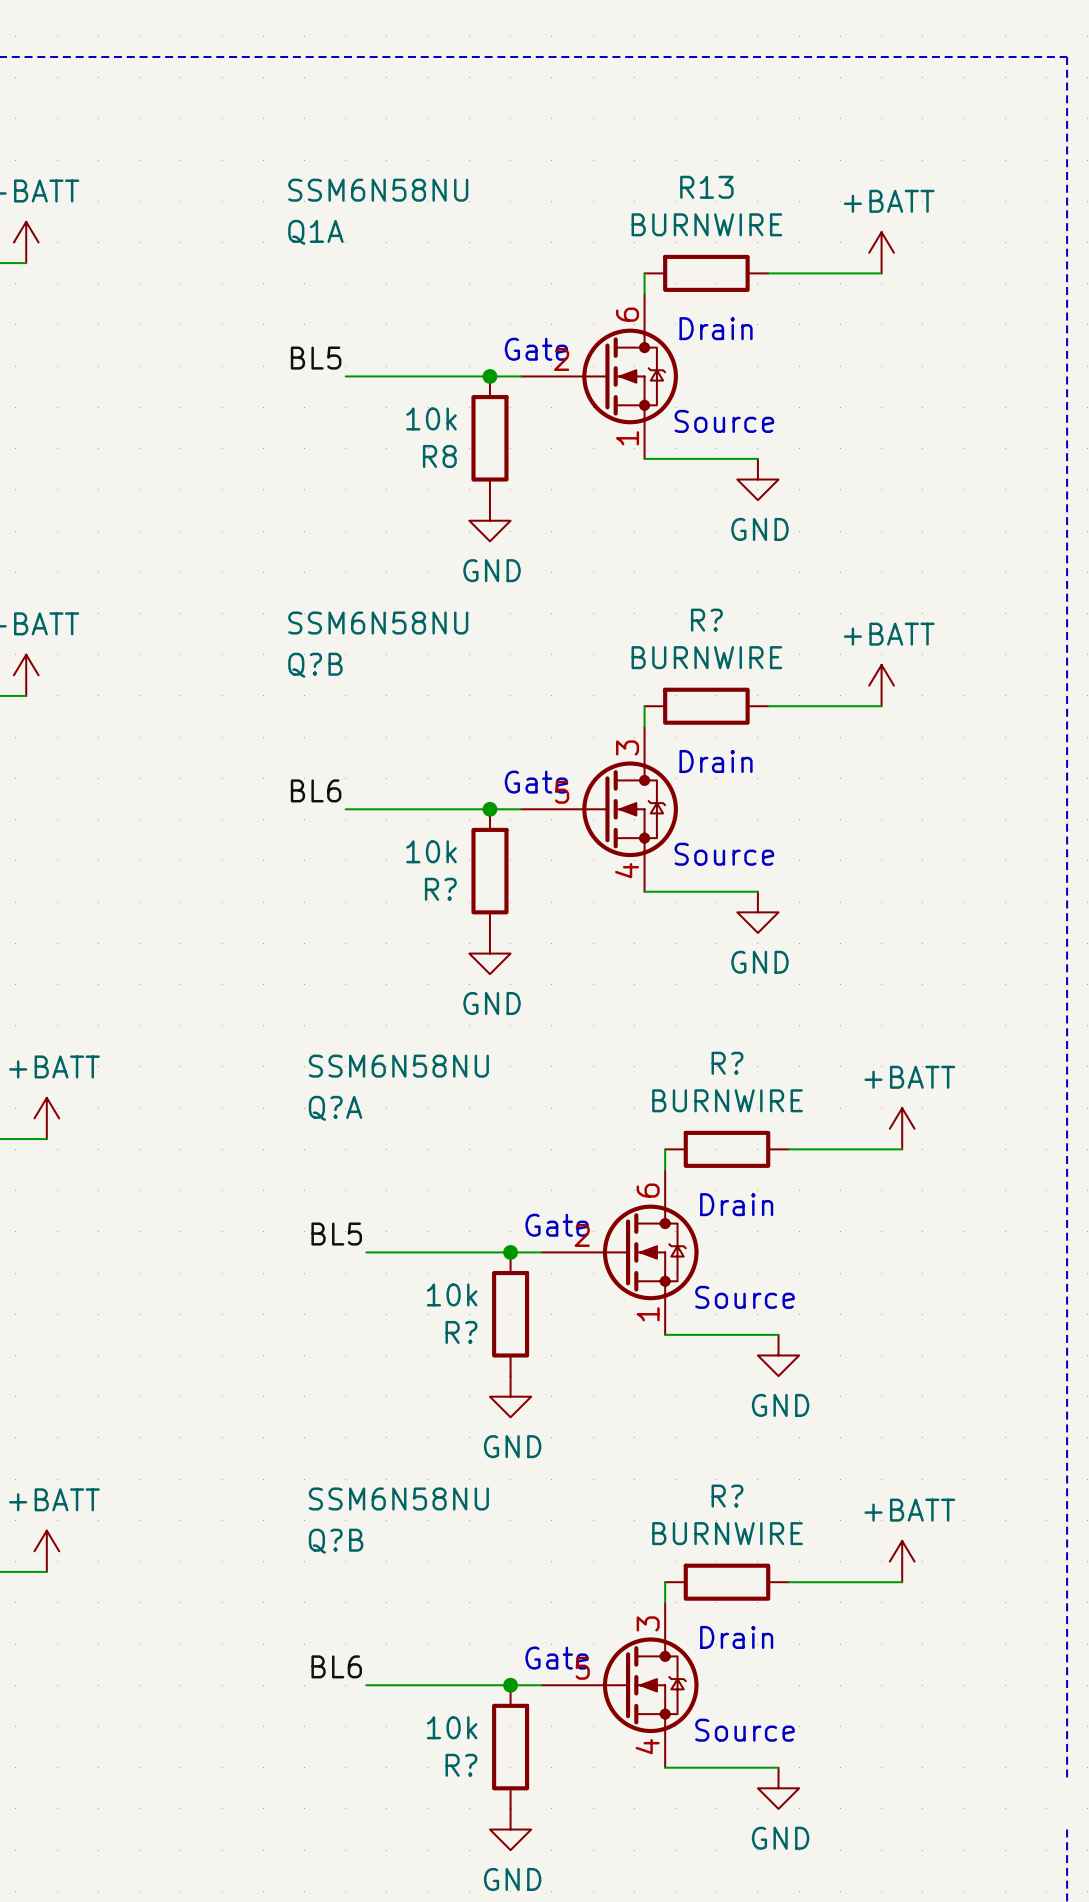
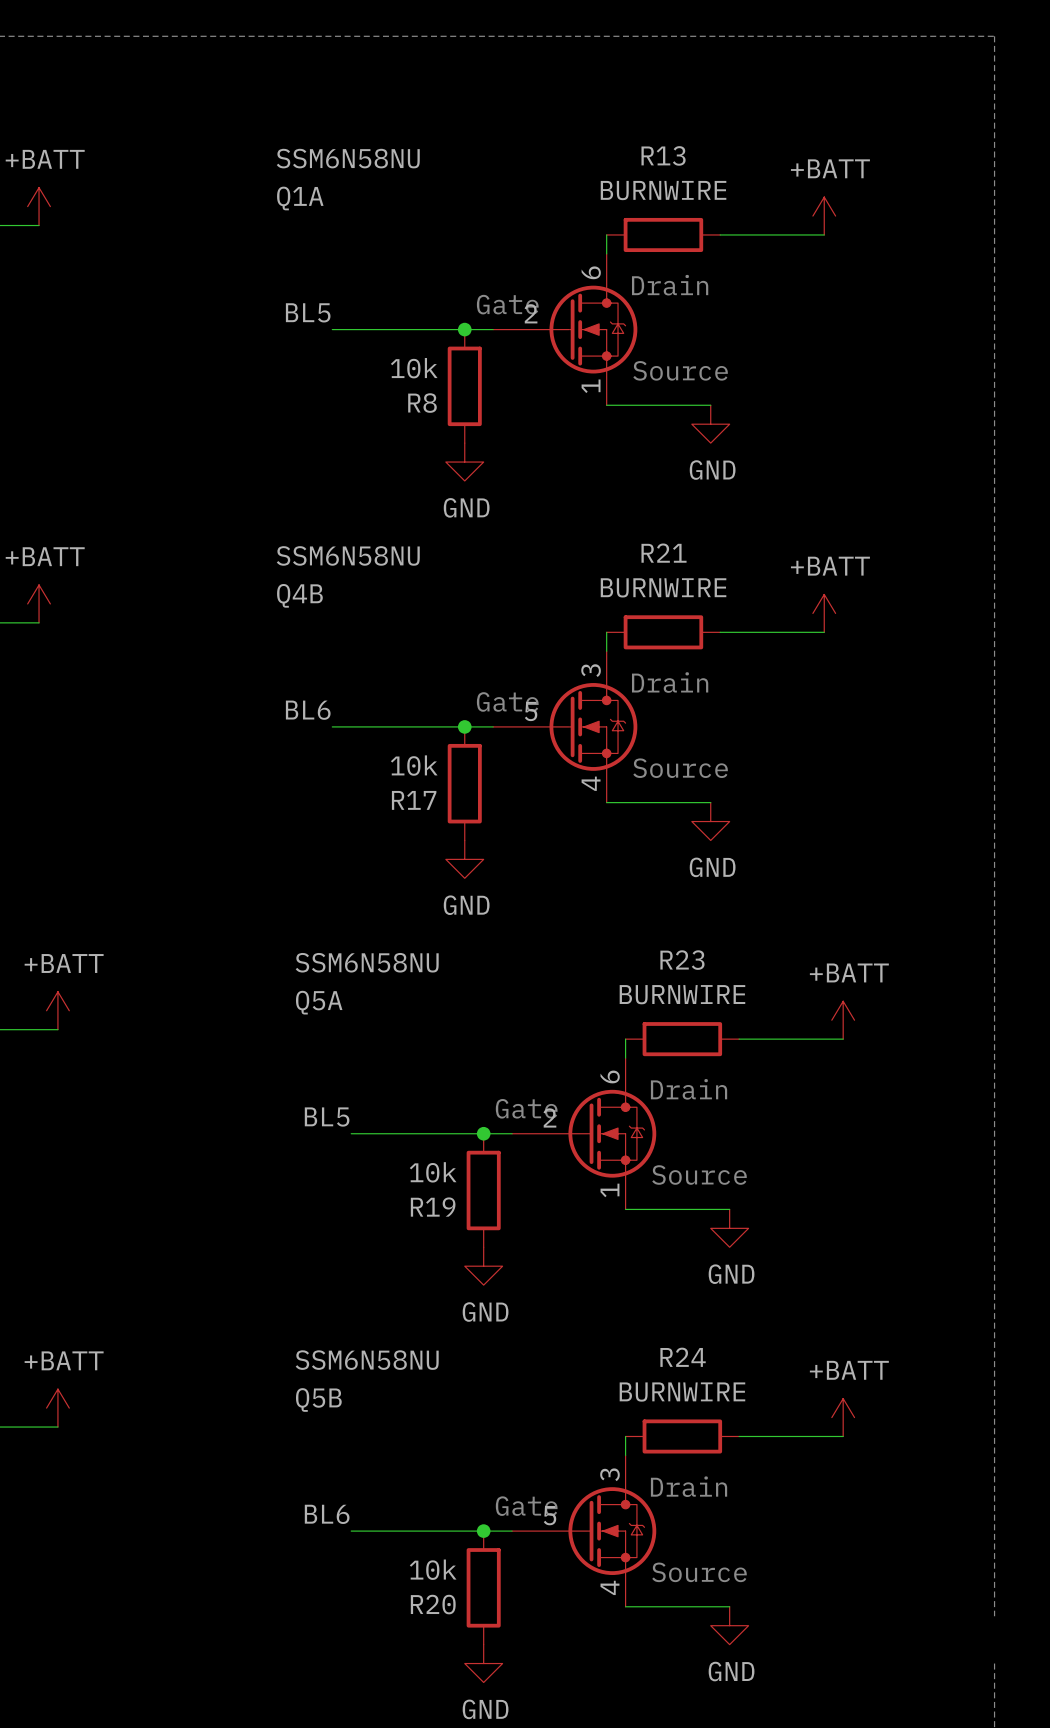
R? name: R? (706, 620) -> R21 (664, 553)
Q?B name: Q?B (315, 665) -> Q4B (299, 595)
R? name: R? (440, 889) -> R17 (414, 800)
R? name: R? (727, 1063) -> R23 (682, 960)
Q?A name: Q?A (335, 1108) -> Q5A (319, 1002)
R? name: R? (461, 1332) -> R19 (433, 1207)
R? name: R? (727, 1496) -> R24 (683, 1357)
Q?B name: Q?B (336, 1541) -> Q5B (318, 1399)
R? name: R? (461, 1765) -> R20 (433, 1604)

